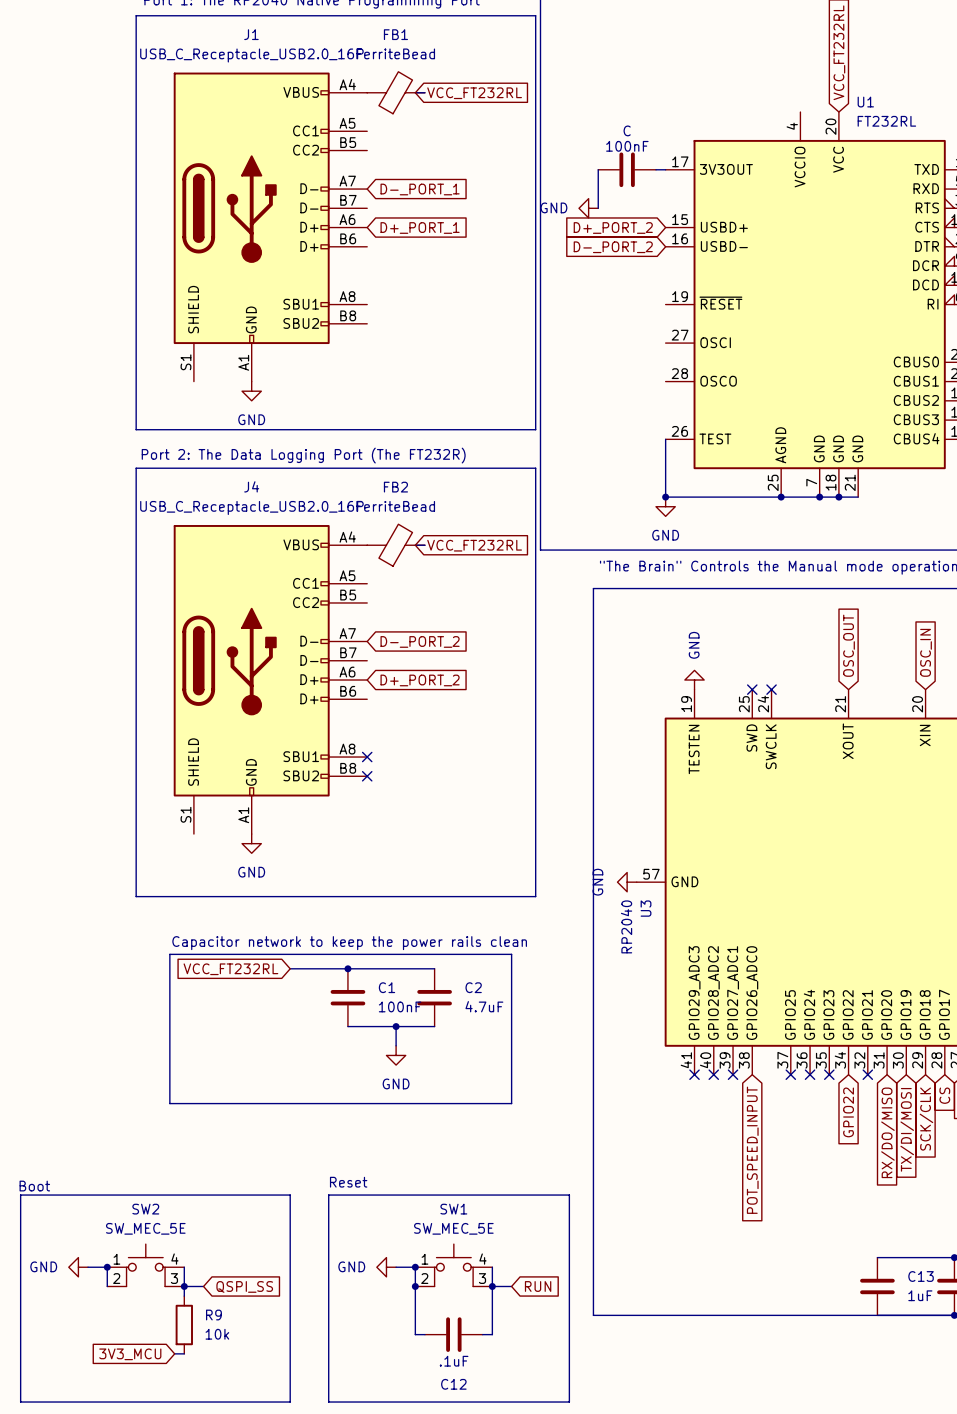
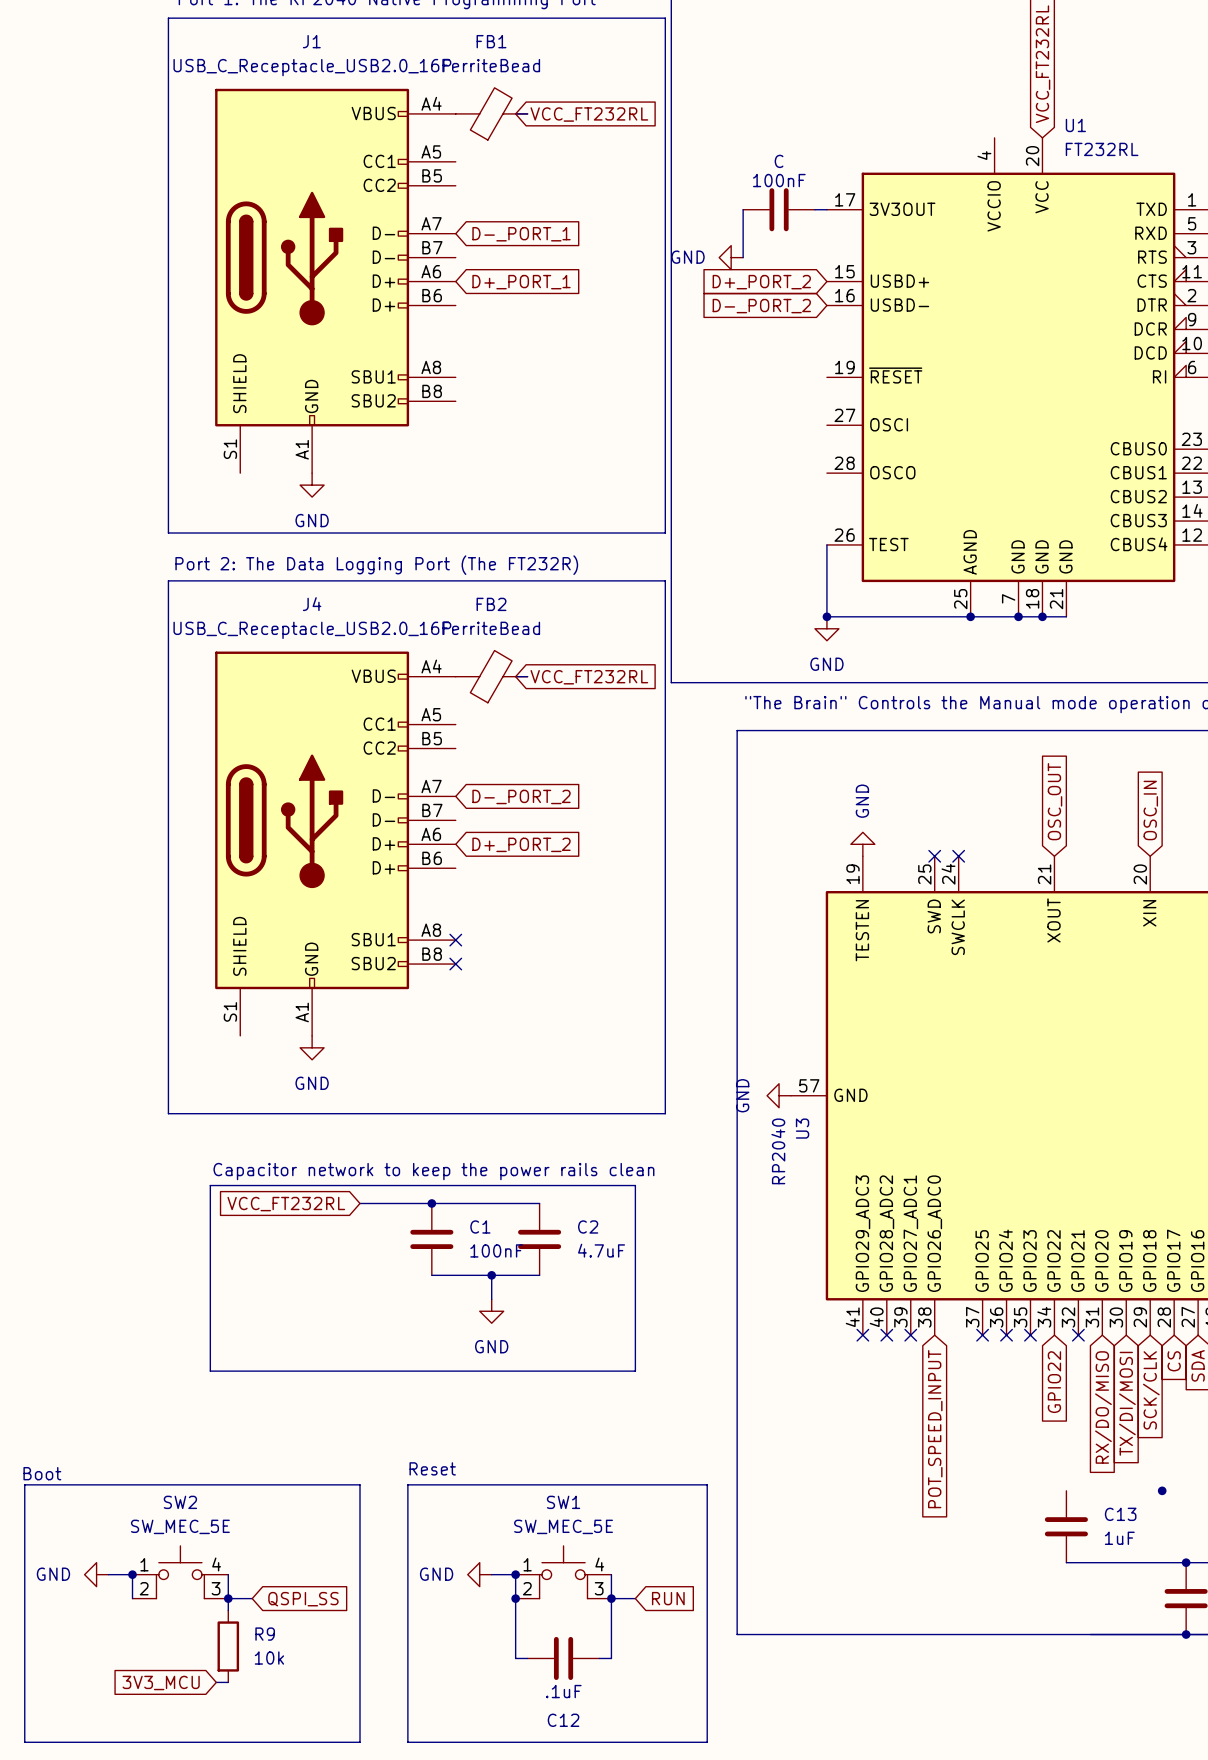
junction: none -> (1162, 1490)
wire: none -> (1066, 1562) (1090, 1562)
C13 position: (877, 1286) -> (1066, 1526)

